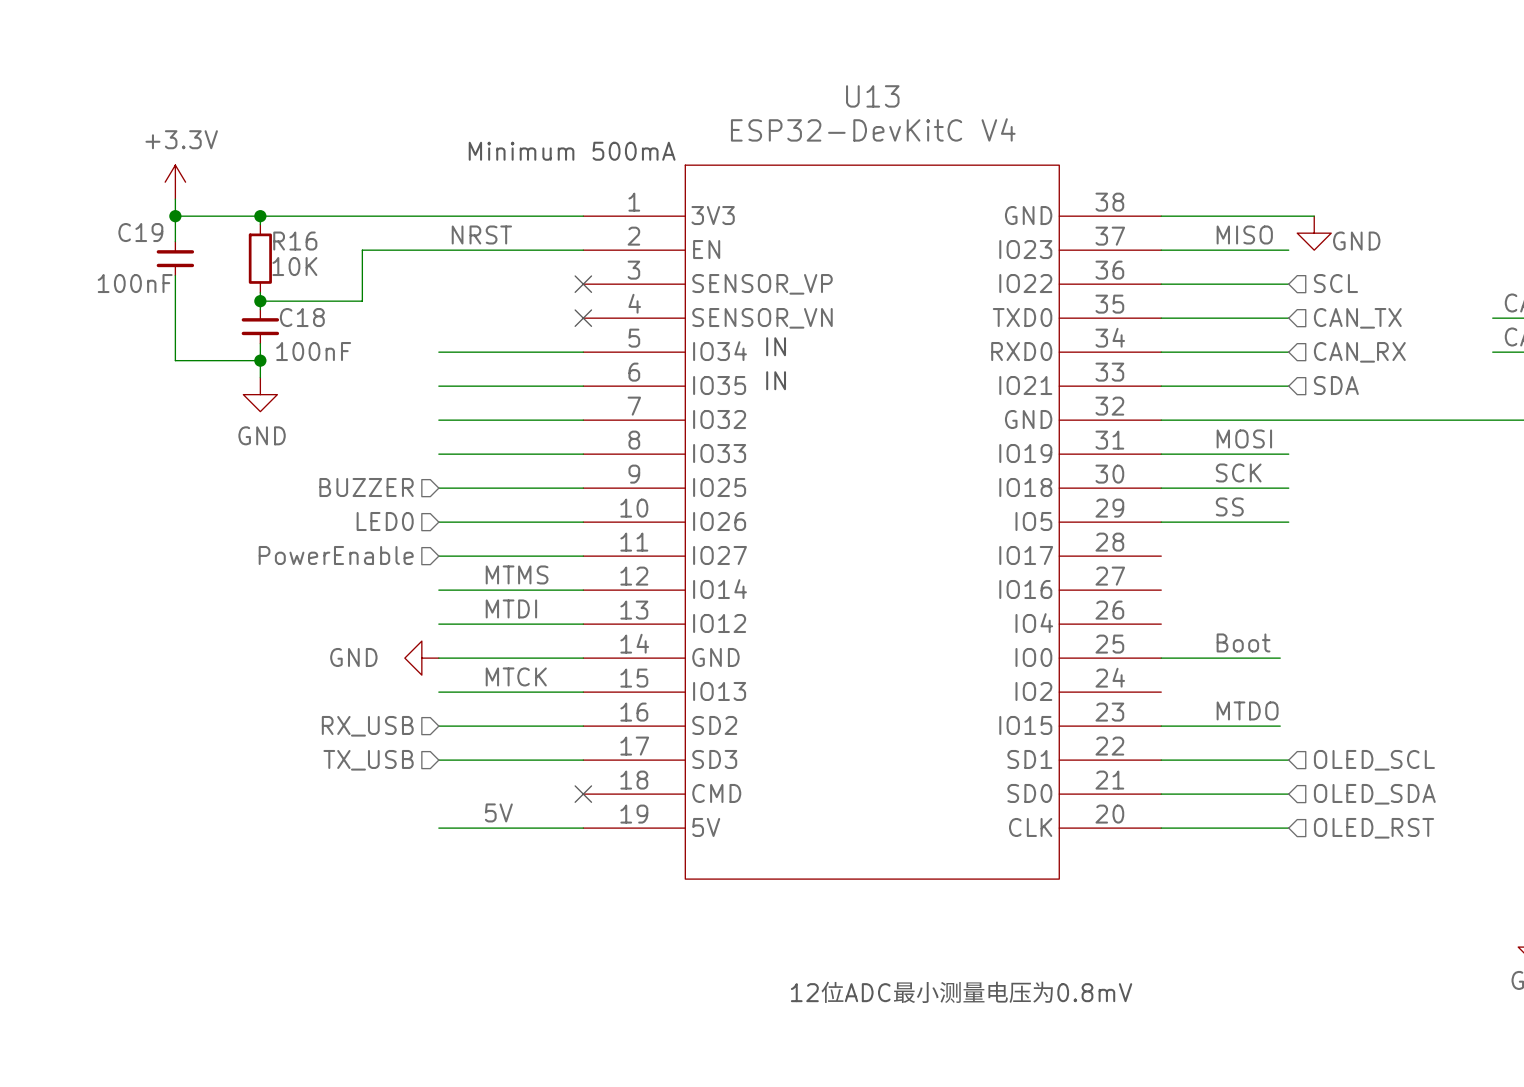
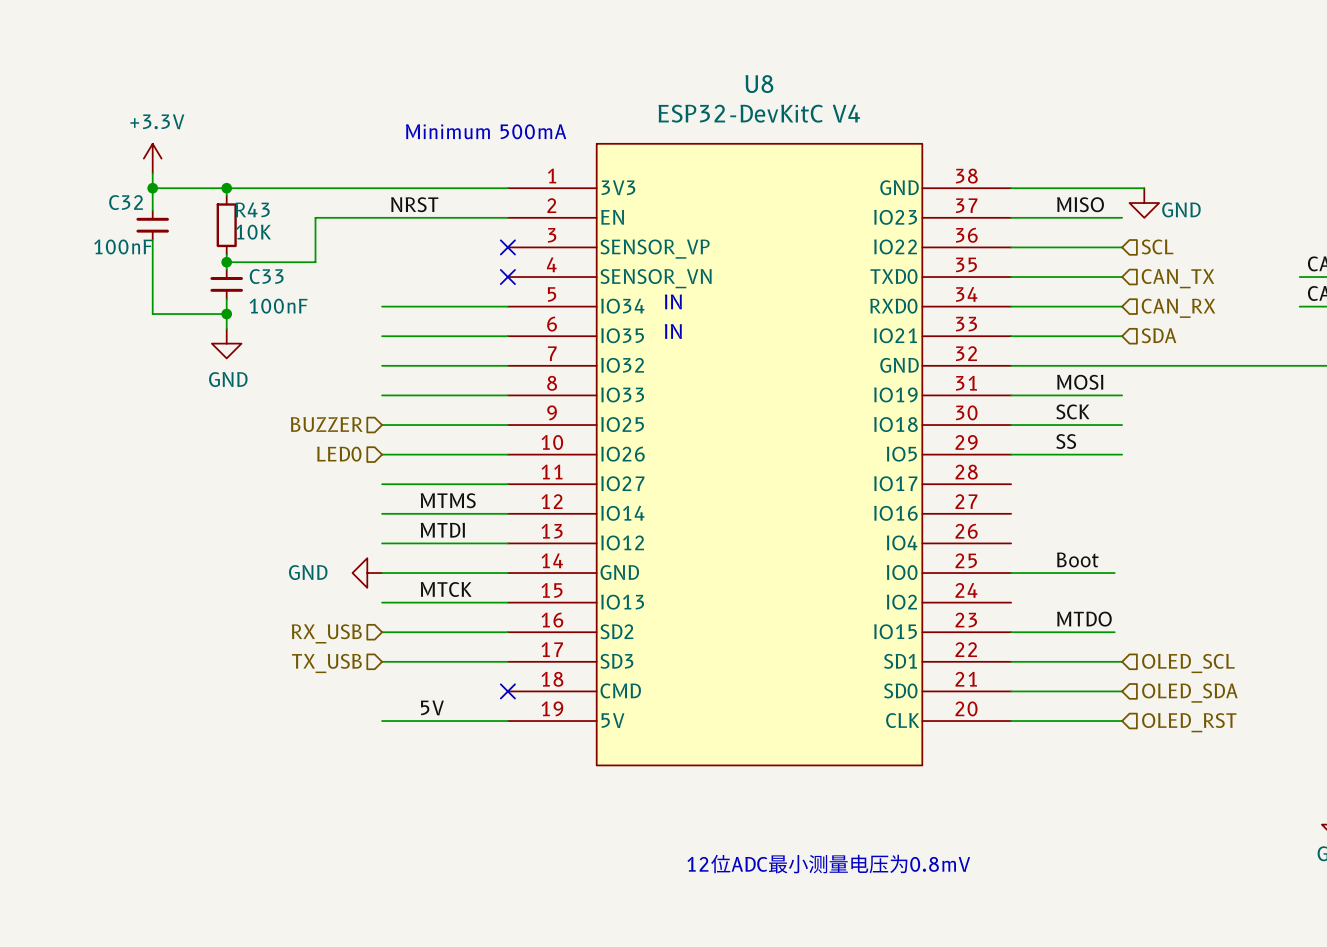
U13 name: U13 (872, 96) -> U8 (759, 84)
C19 name: C19 (140, 232) -> C32 (126, 202)
R16 name: R16 (295, 241) -> R43 (252, 209)
C18 name: C18 (302, 317) -> C33 (266, 276)
hierarchical label: PowerEnable (336, 555) -> none

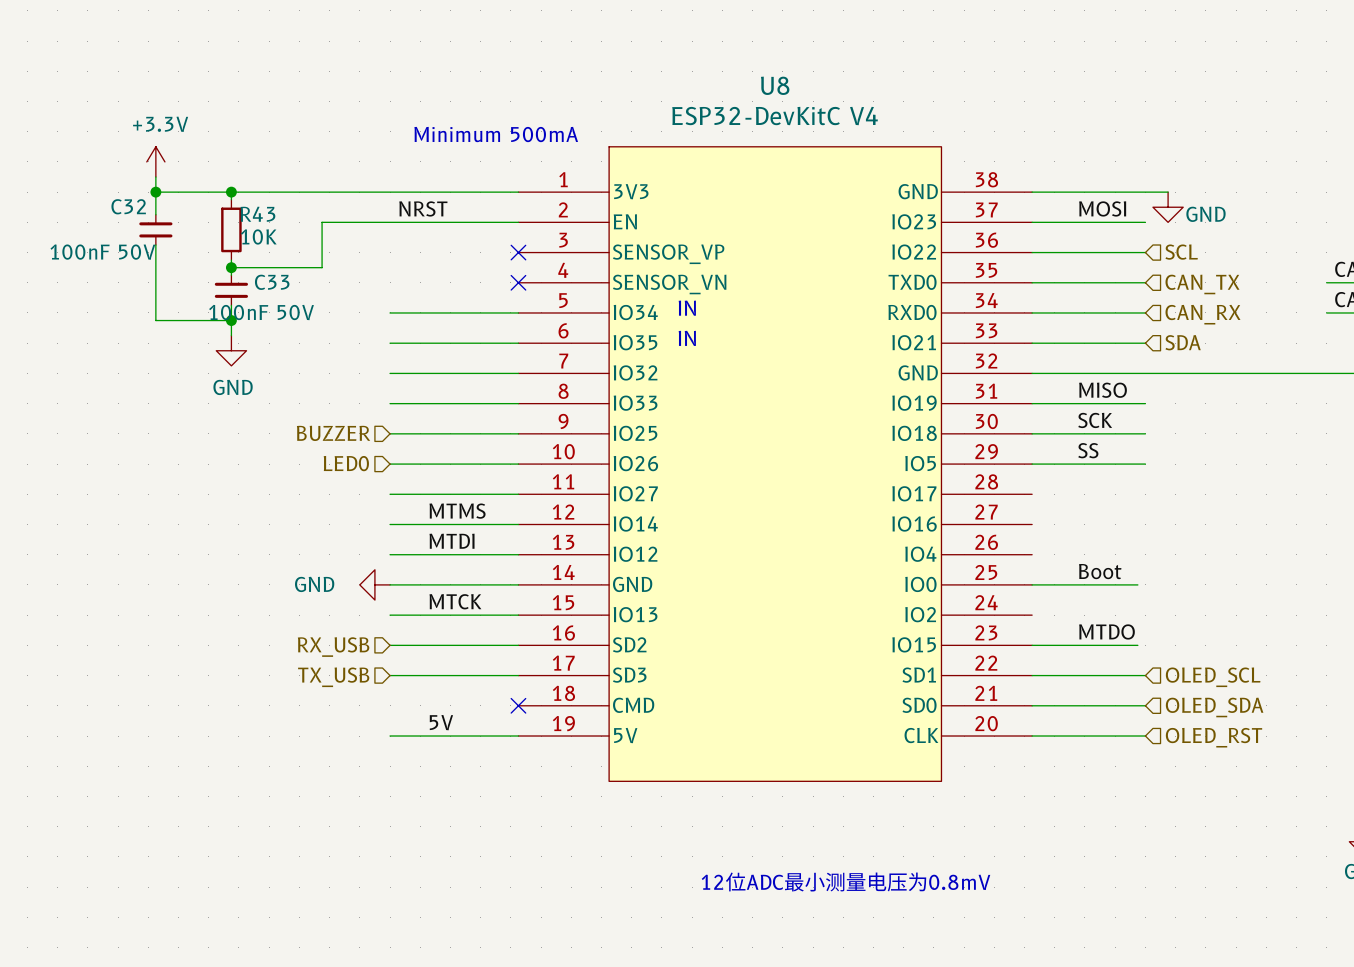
label: MISO (1080, 204) -> MOSI (1102, 208)
C32 value: 100nF (123, 246) -> 100nF 50V (102, 252)
C33 value: 100nF (278, 306) -> 100nF 50V (261, 312)
label: MOSI (1080, 382) -> MISO (1103, 390)

